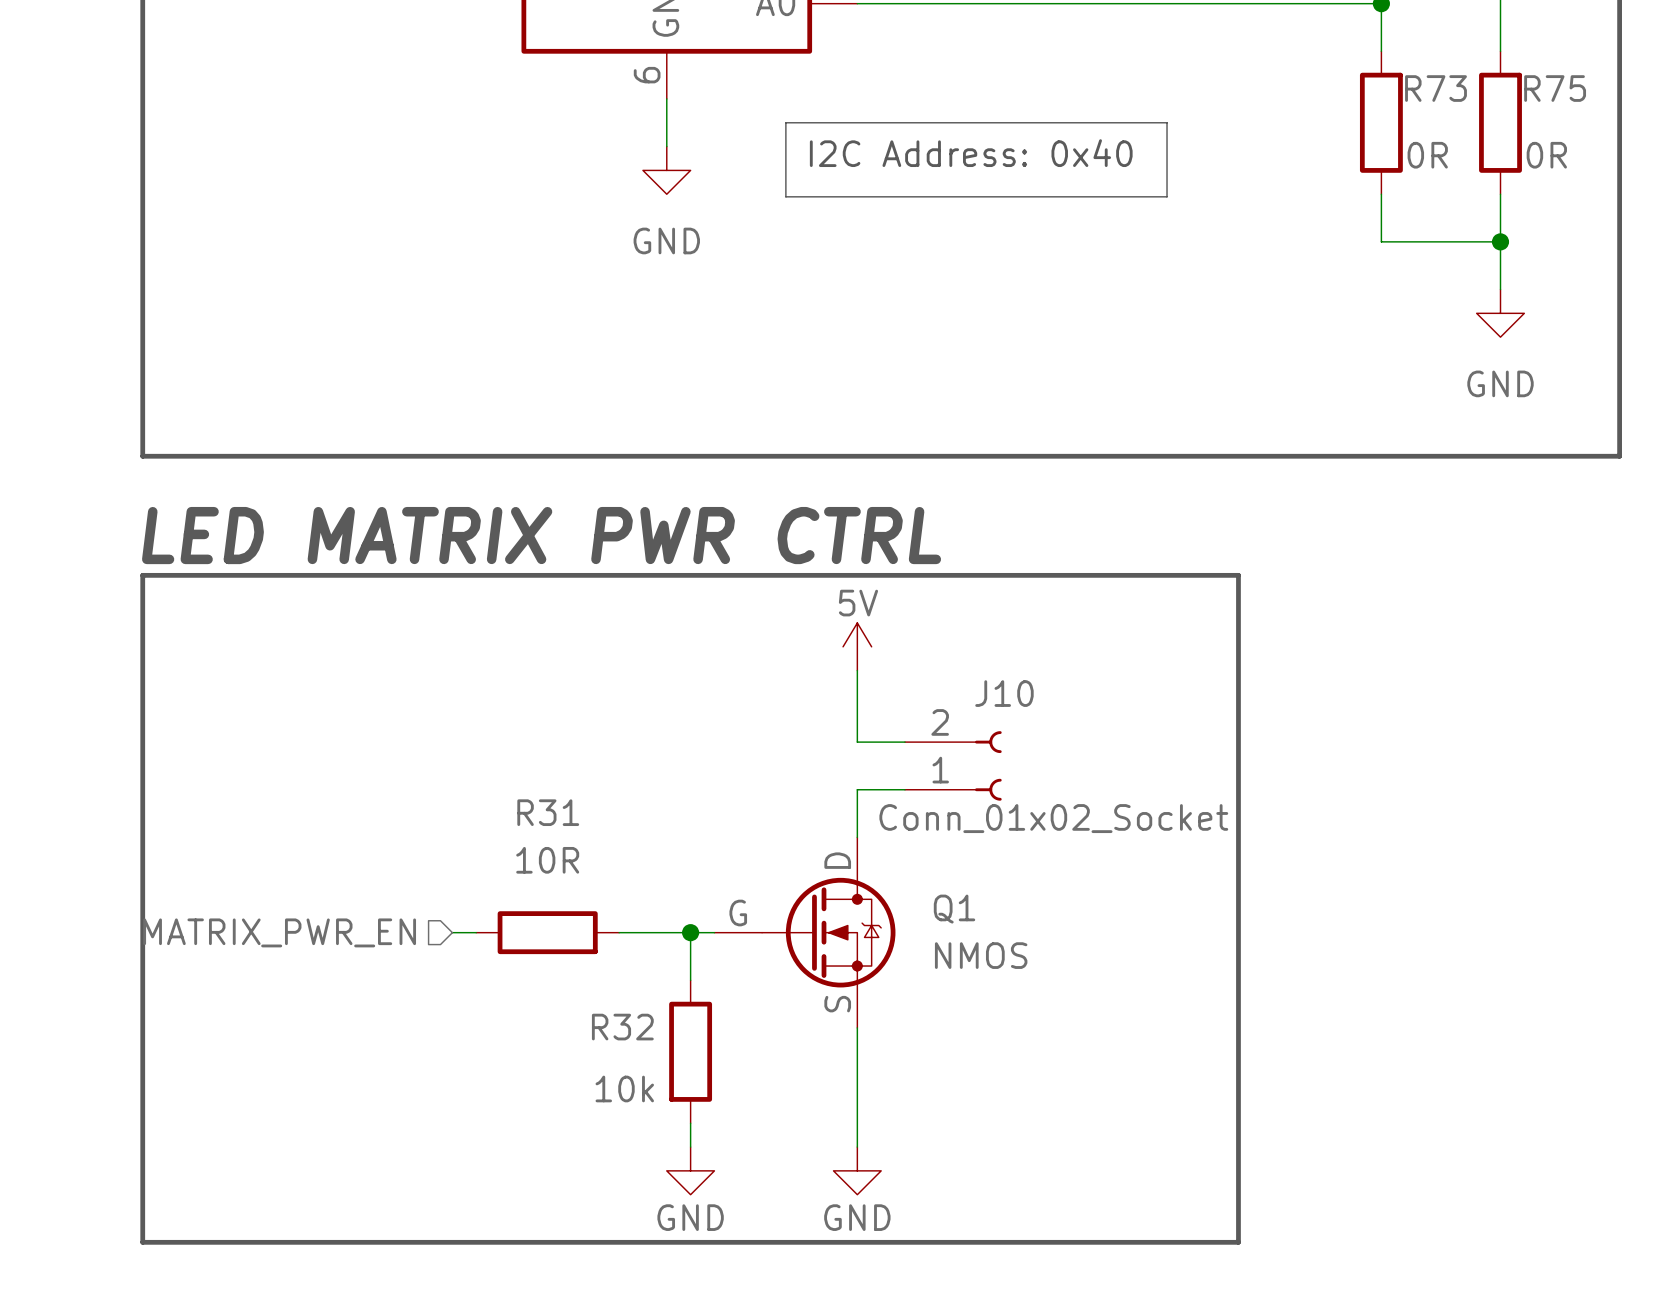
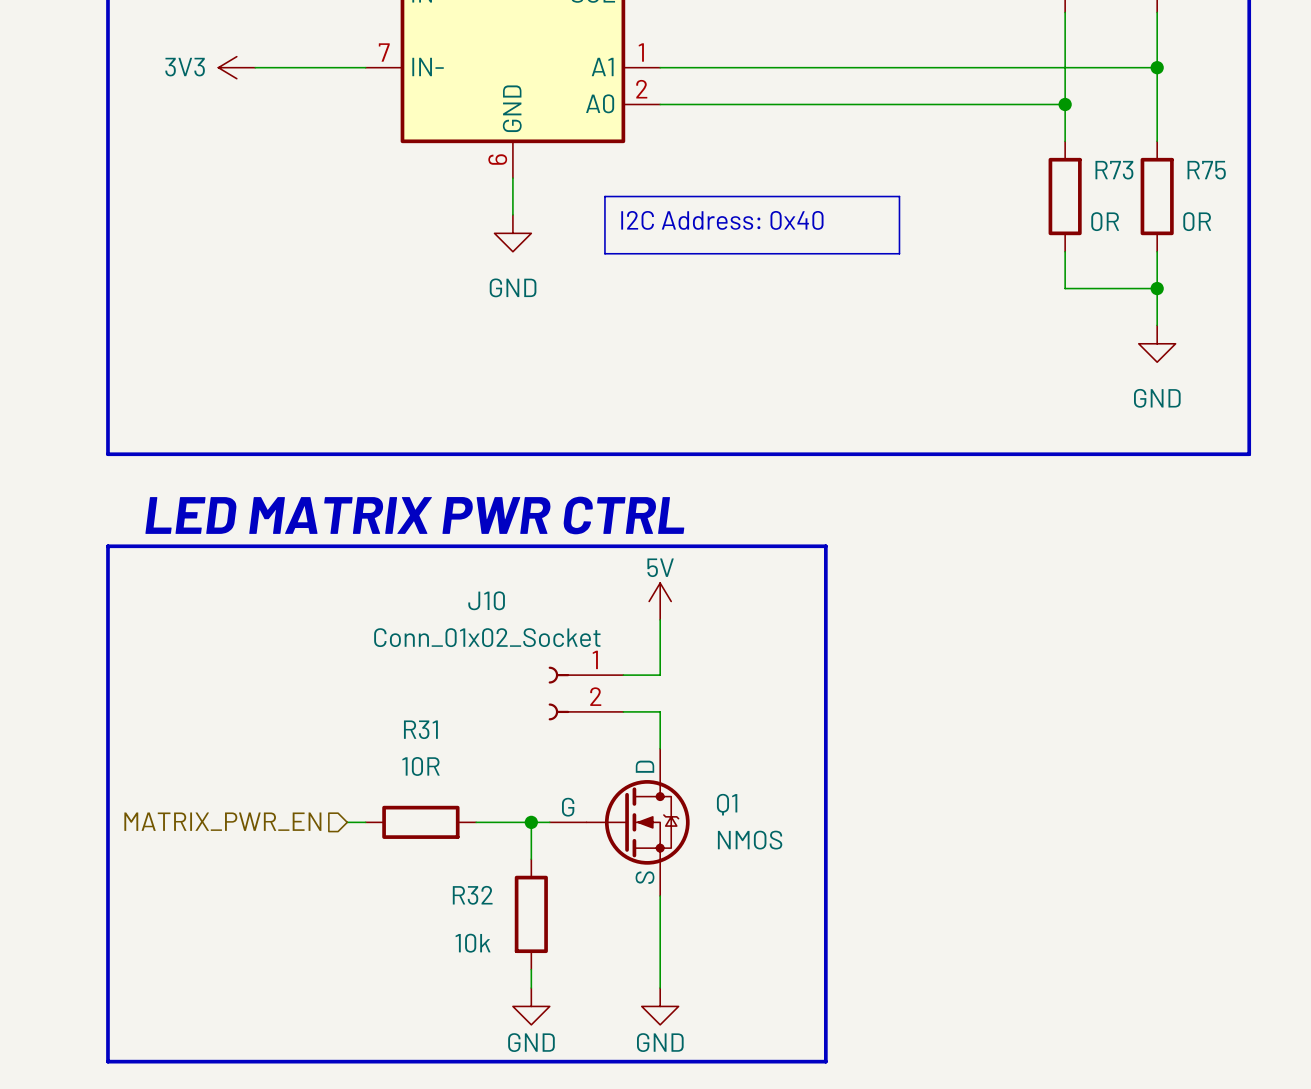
line: (1071, 575) (1238, 575) (1238, 1242) (1071, 1242) -> (825, 546) (825, 1061)
J10 name position: J10 (1004, 693) -> J10 (486, 600)
wire: (857, 742) (904, 742) -> (660, 675) (623, 675)
J10 position: (953, 765) -> (586, 693)
J10 rotation: 0° (988, 765) -> 180° (558, 693)
wire: (857, 789) (904, 789) -> (660, 711) (623, 711)

